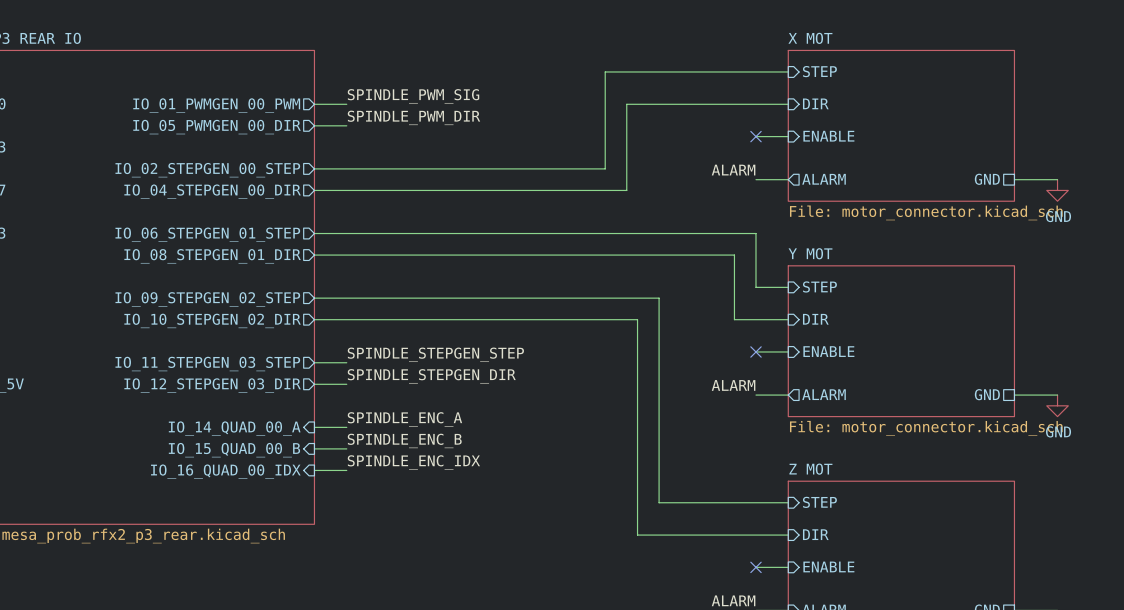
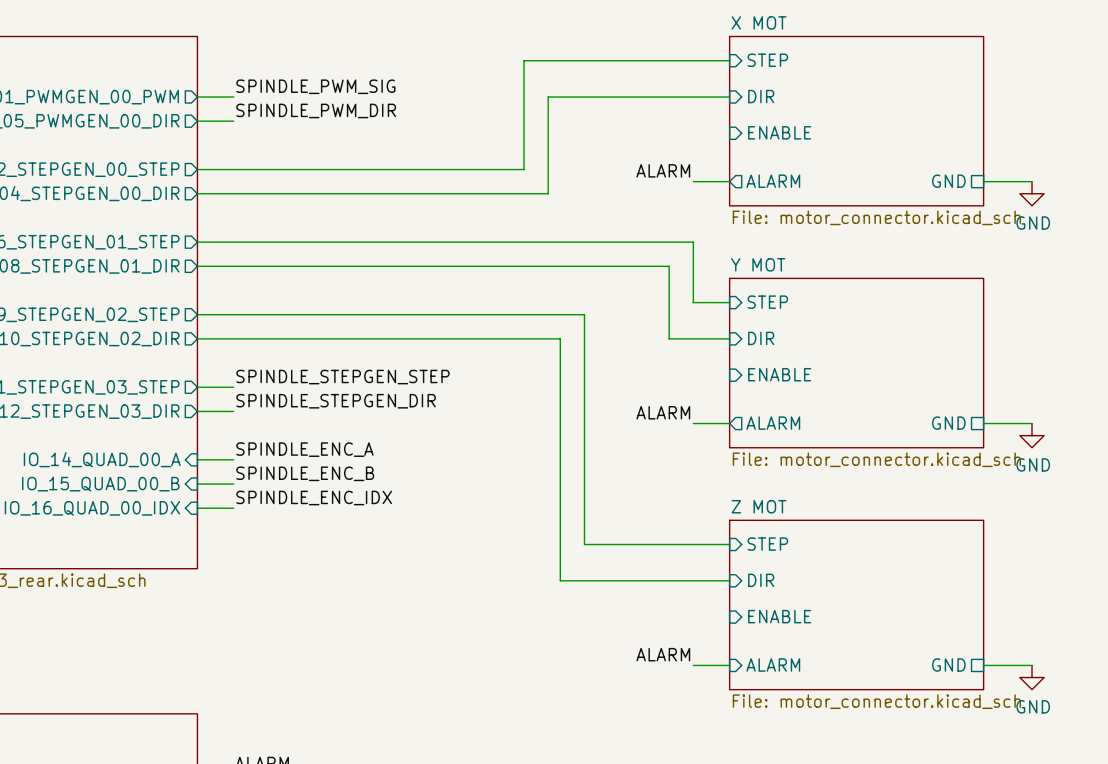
wire: (755, 136) (788, 136) -> none
no-connect mark: (755, 136) -> none
wire: (755, 351) (788, 351) -> none
no-connect mark: (755, 351) -> none
wire: (755, 567) (788, 567) -> none
no-connect mark: (755, 567) -> none

